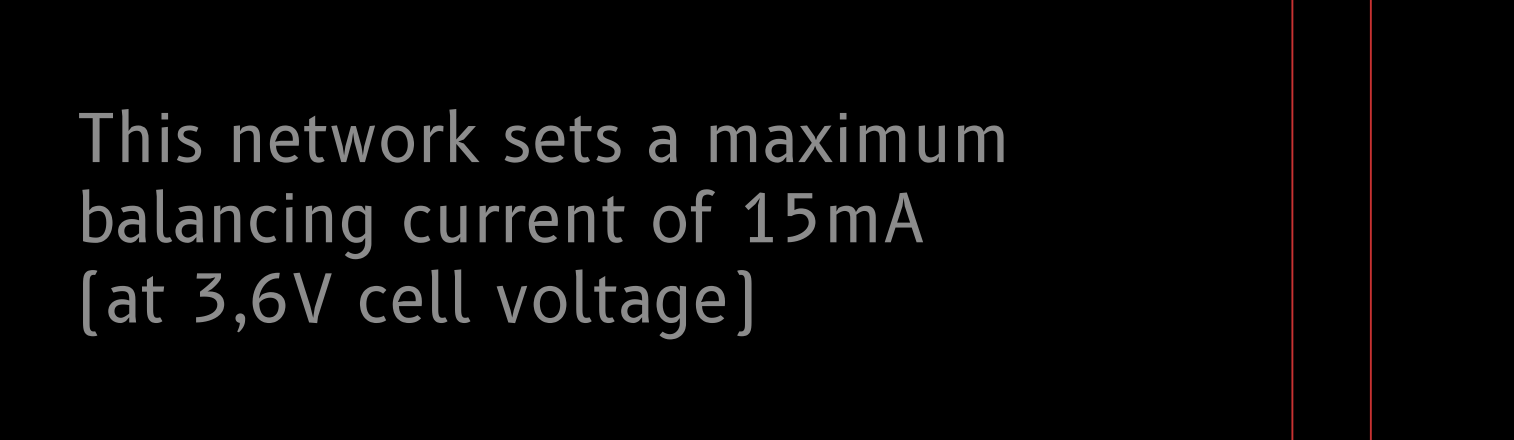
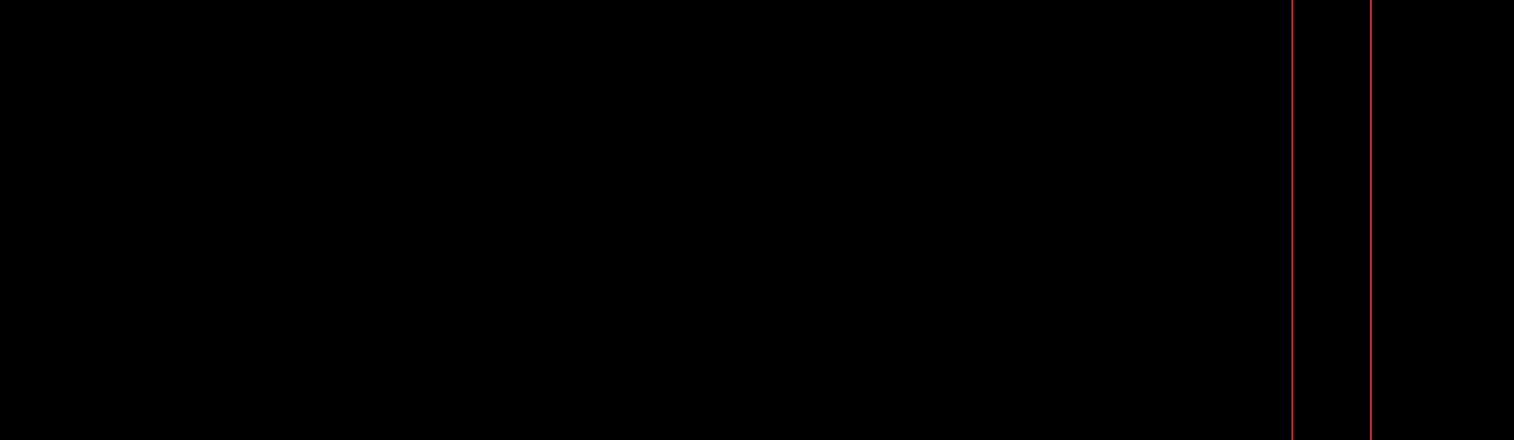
text: This network sets a maximum (541, 135) -> none
text: balancing current of 15mA (502, 224) -> none
text: (at 3,6V cell voltage) (417, 304) -> none

